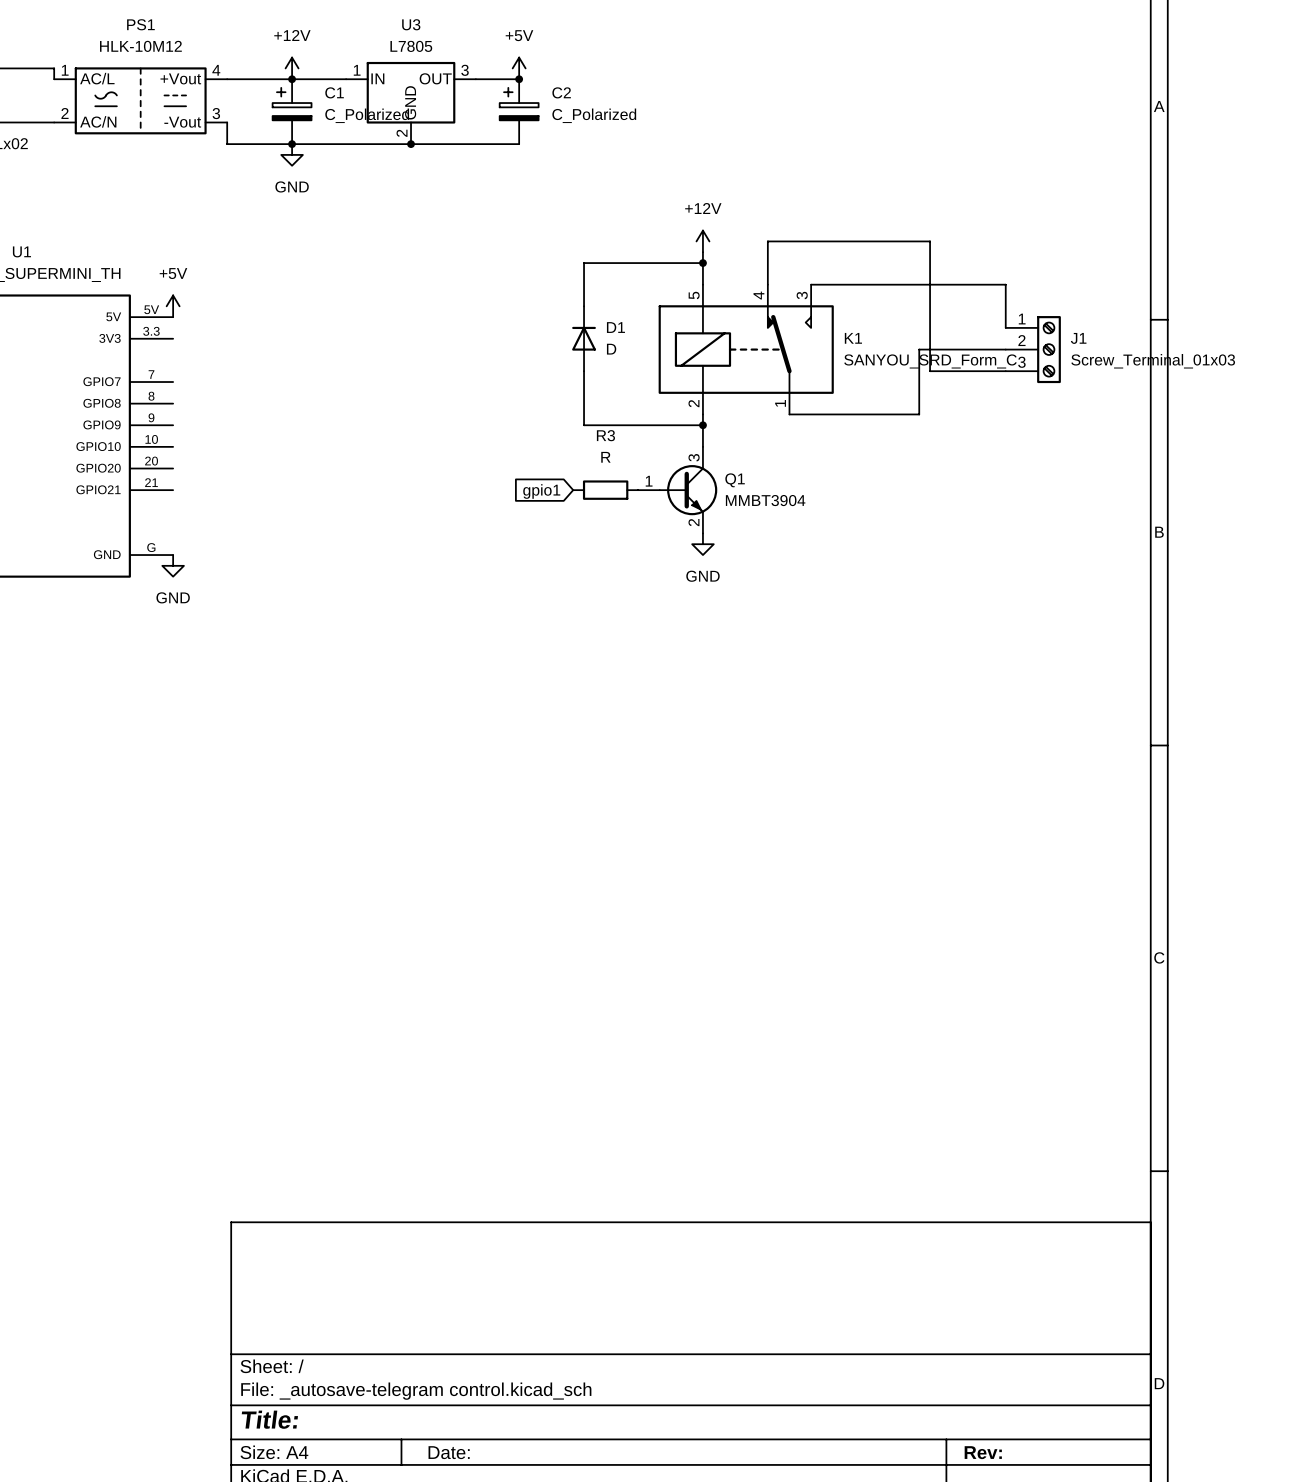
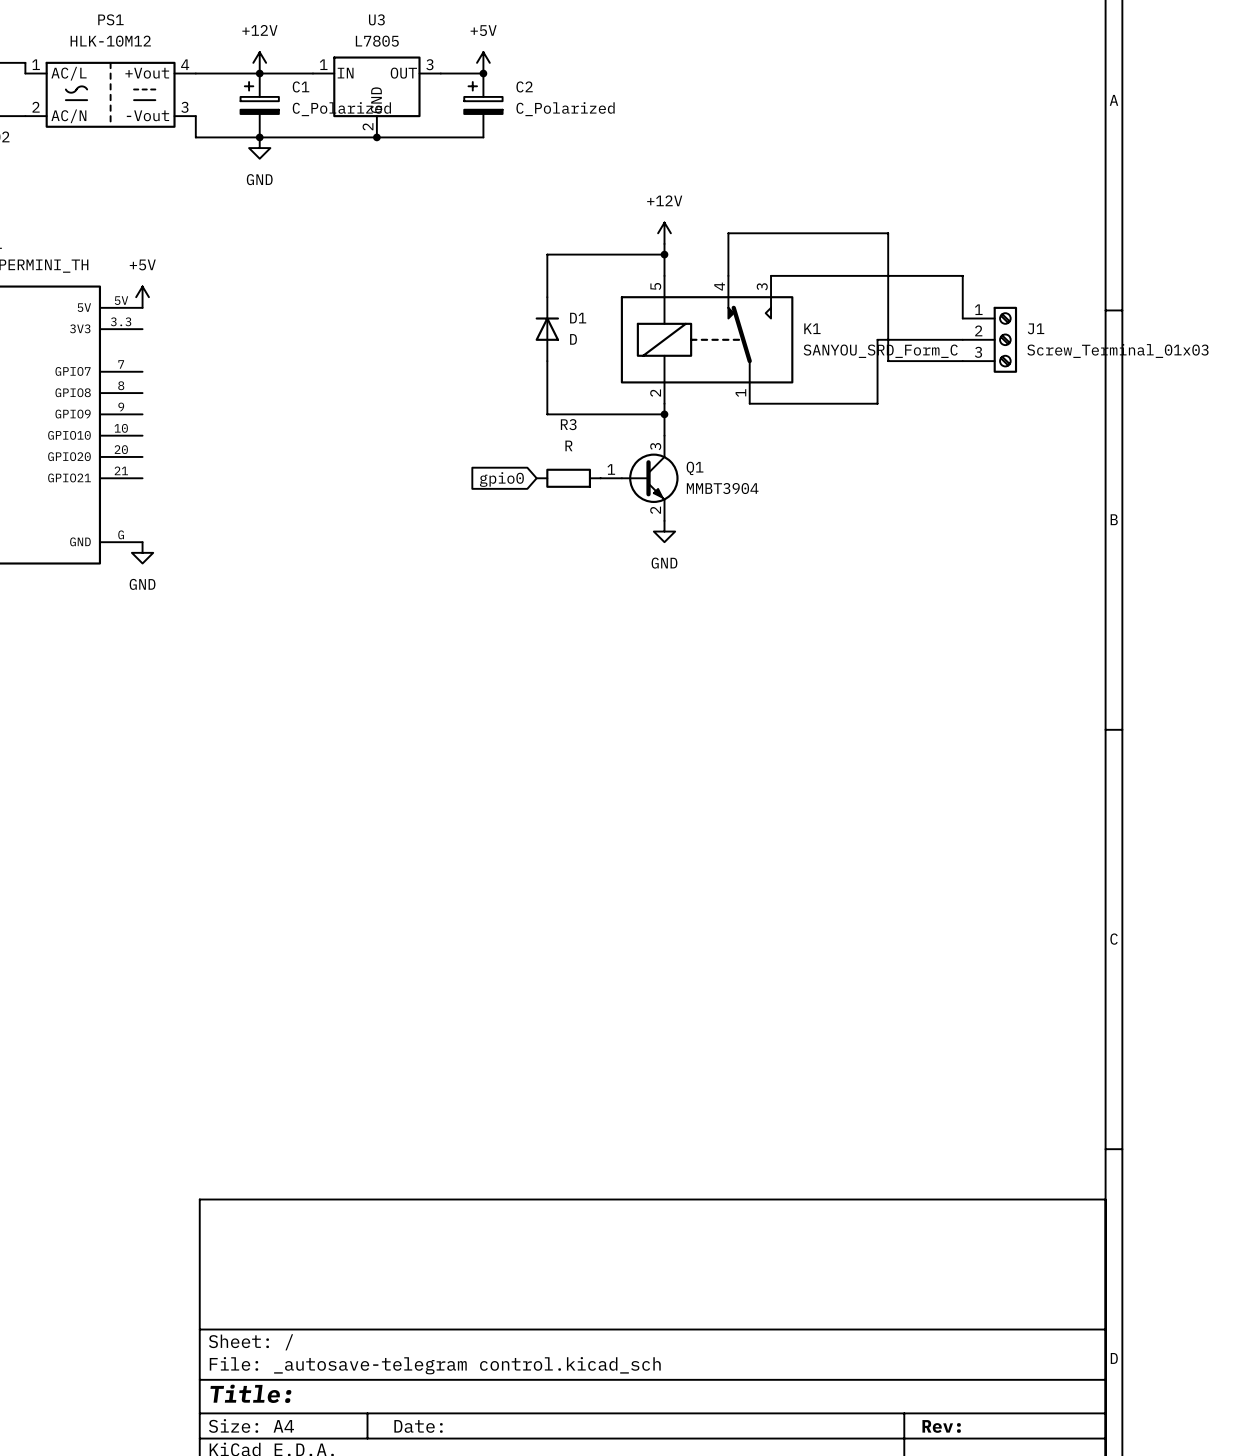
global label: gpio1 (541, 491) -> gpio0 (501, 479)

